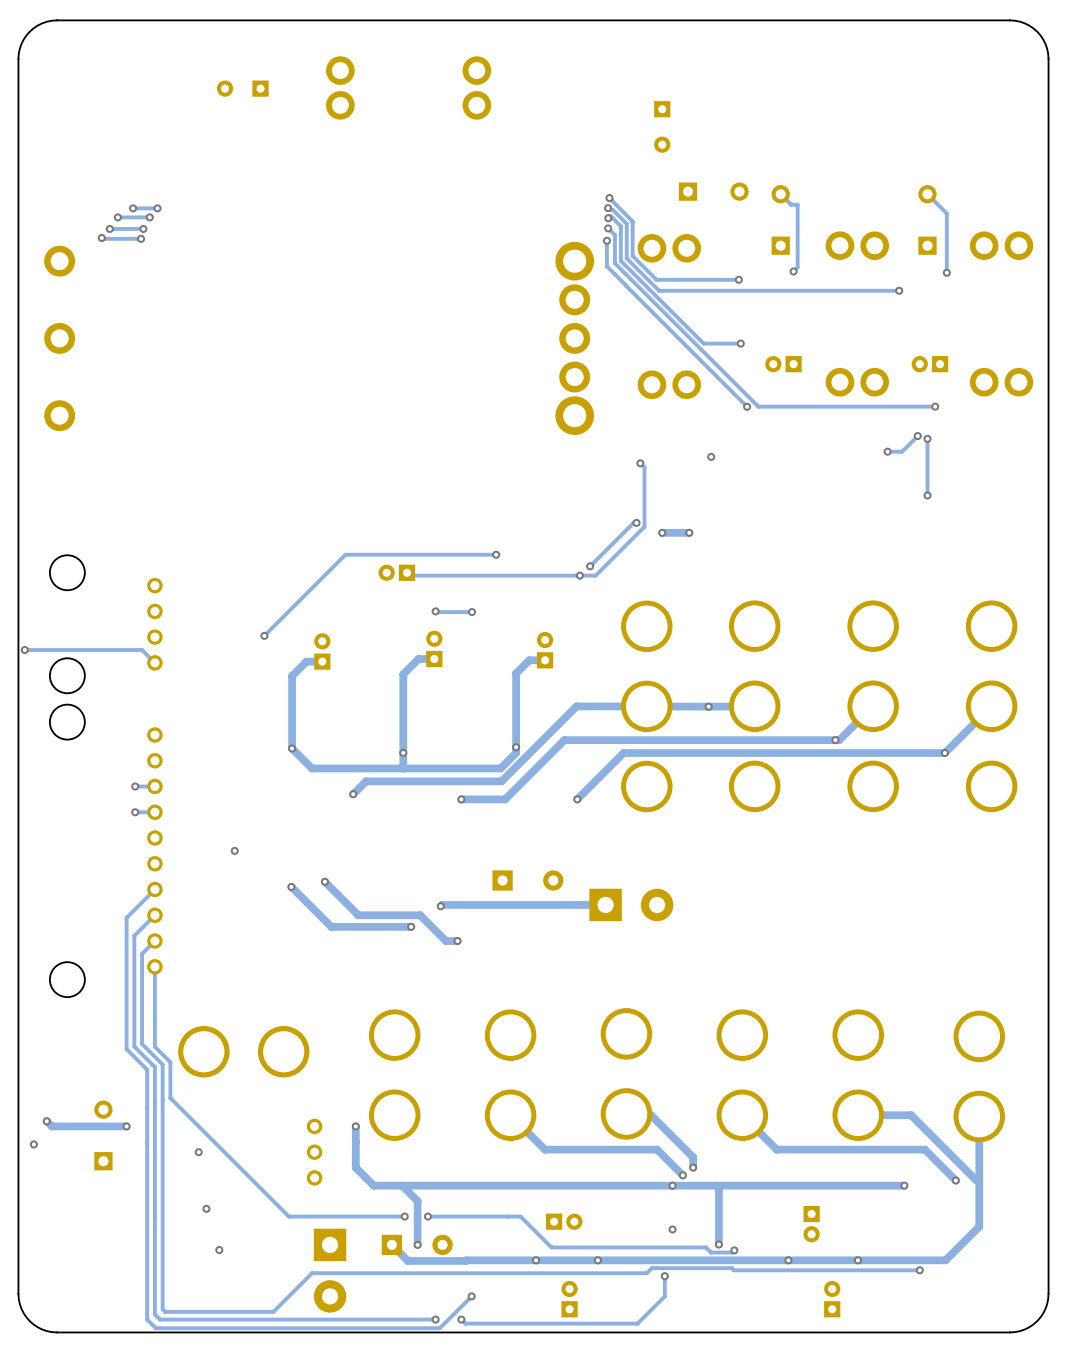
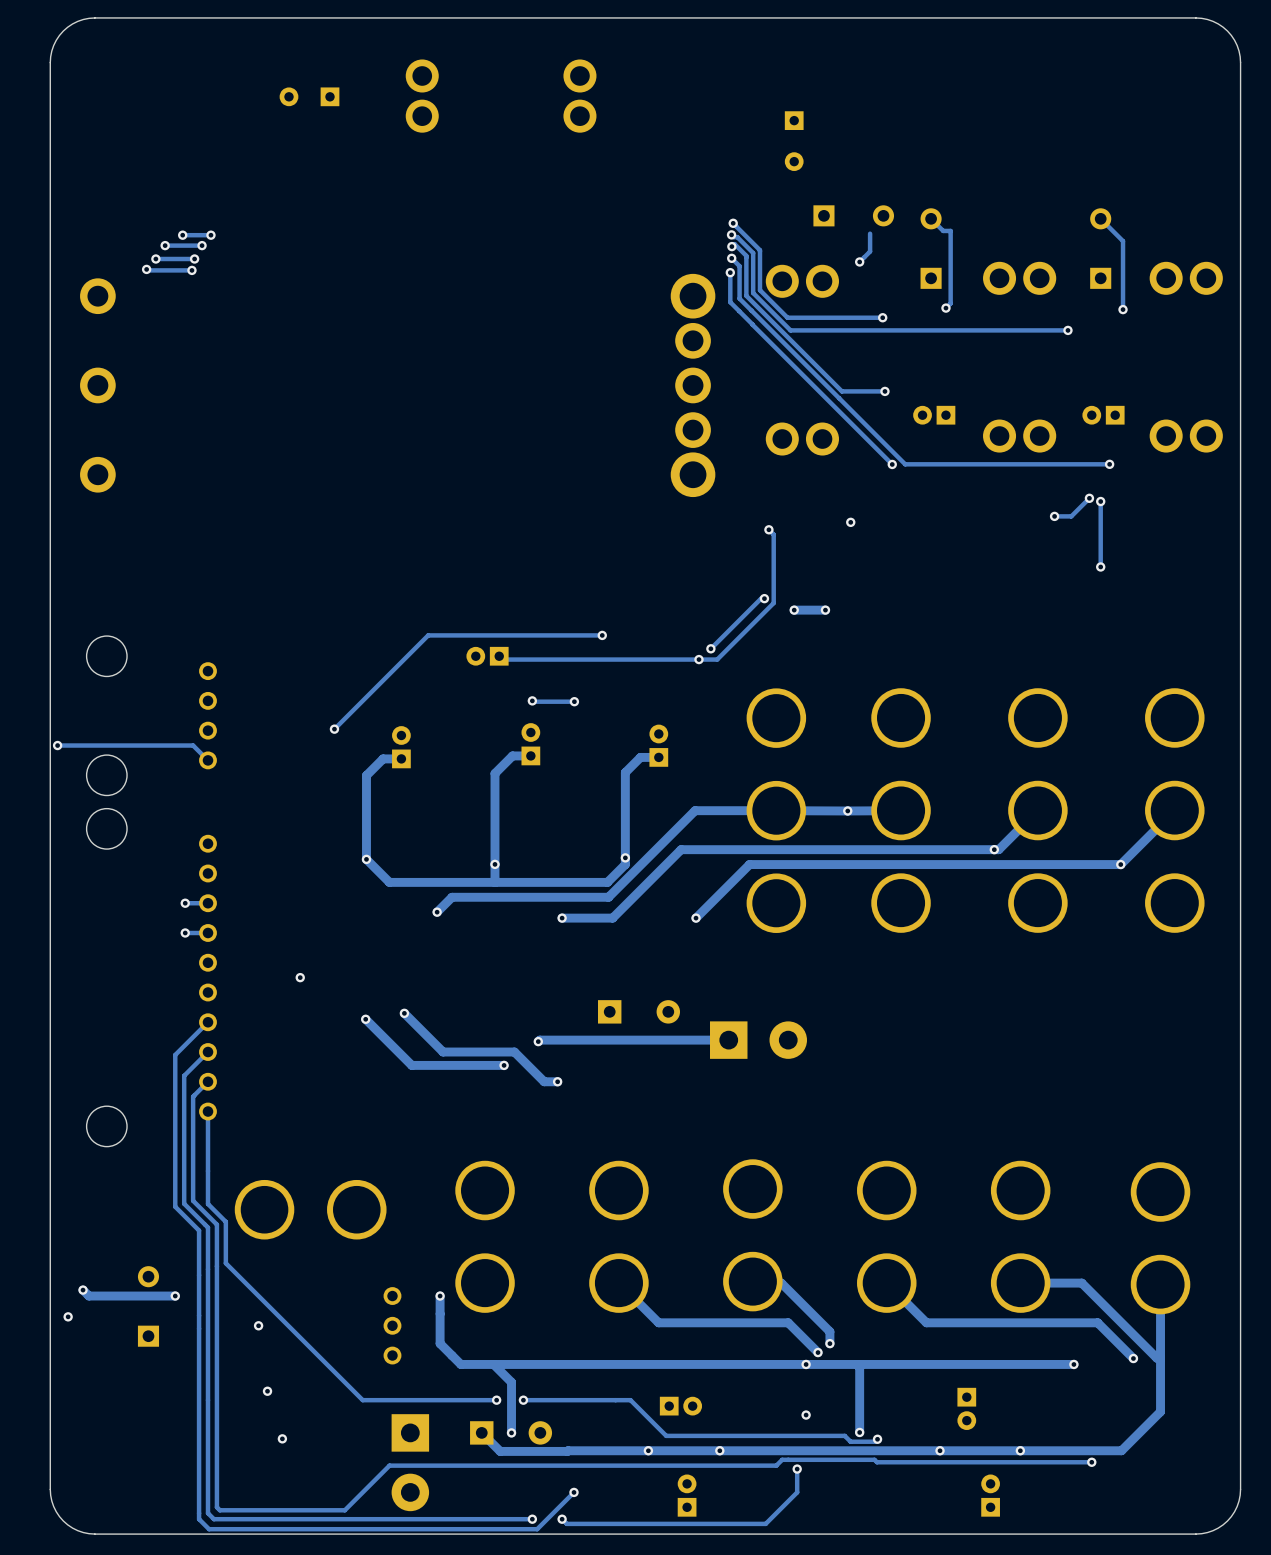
track: none -> (870, 233) (870, 251) (859, 261)
via: none -> (859, 261)

